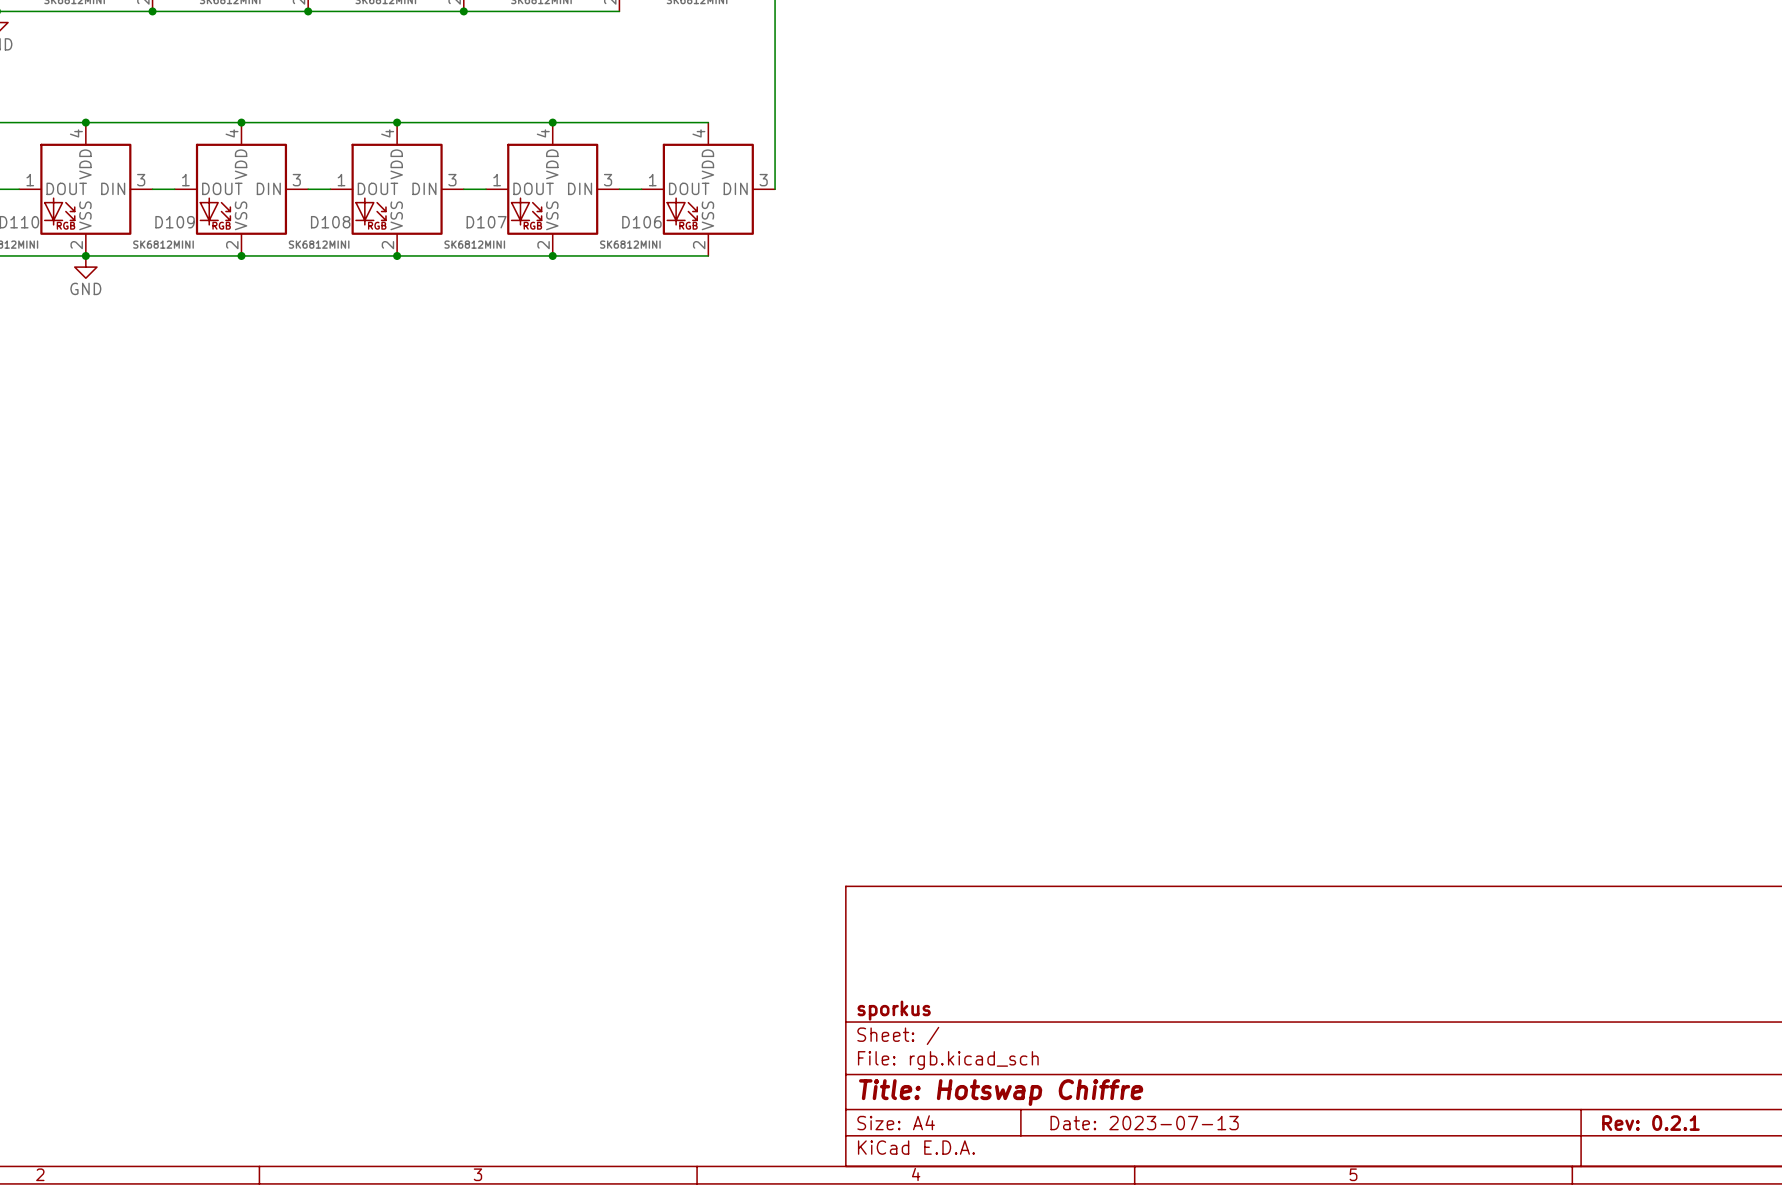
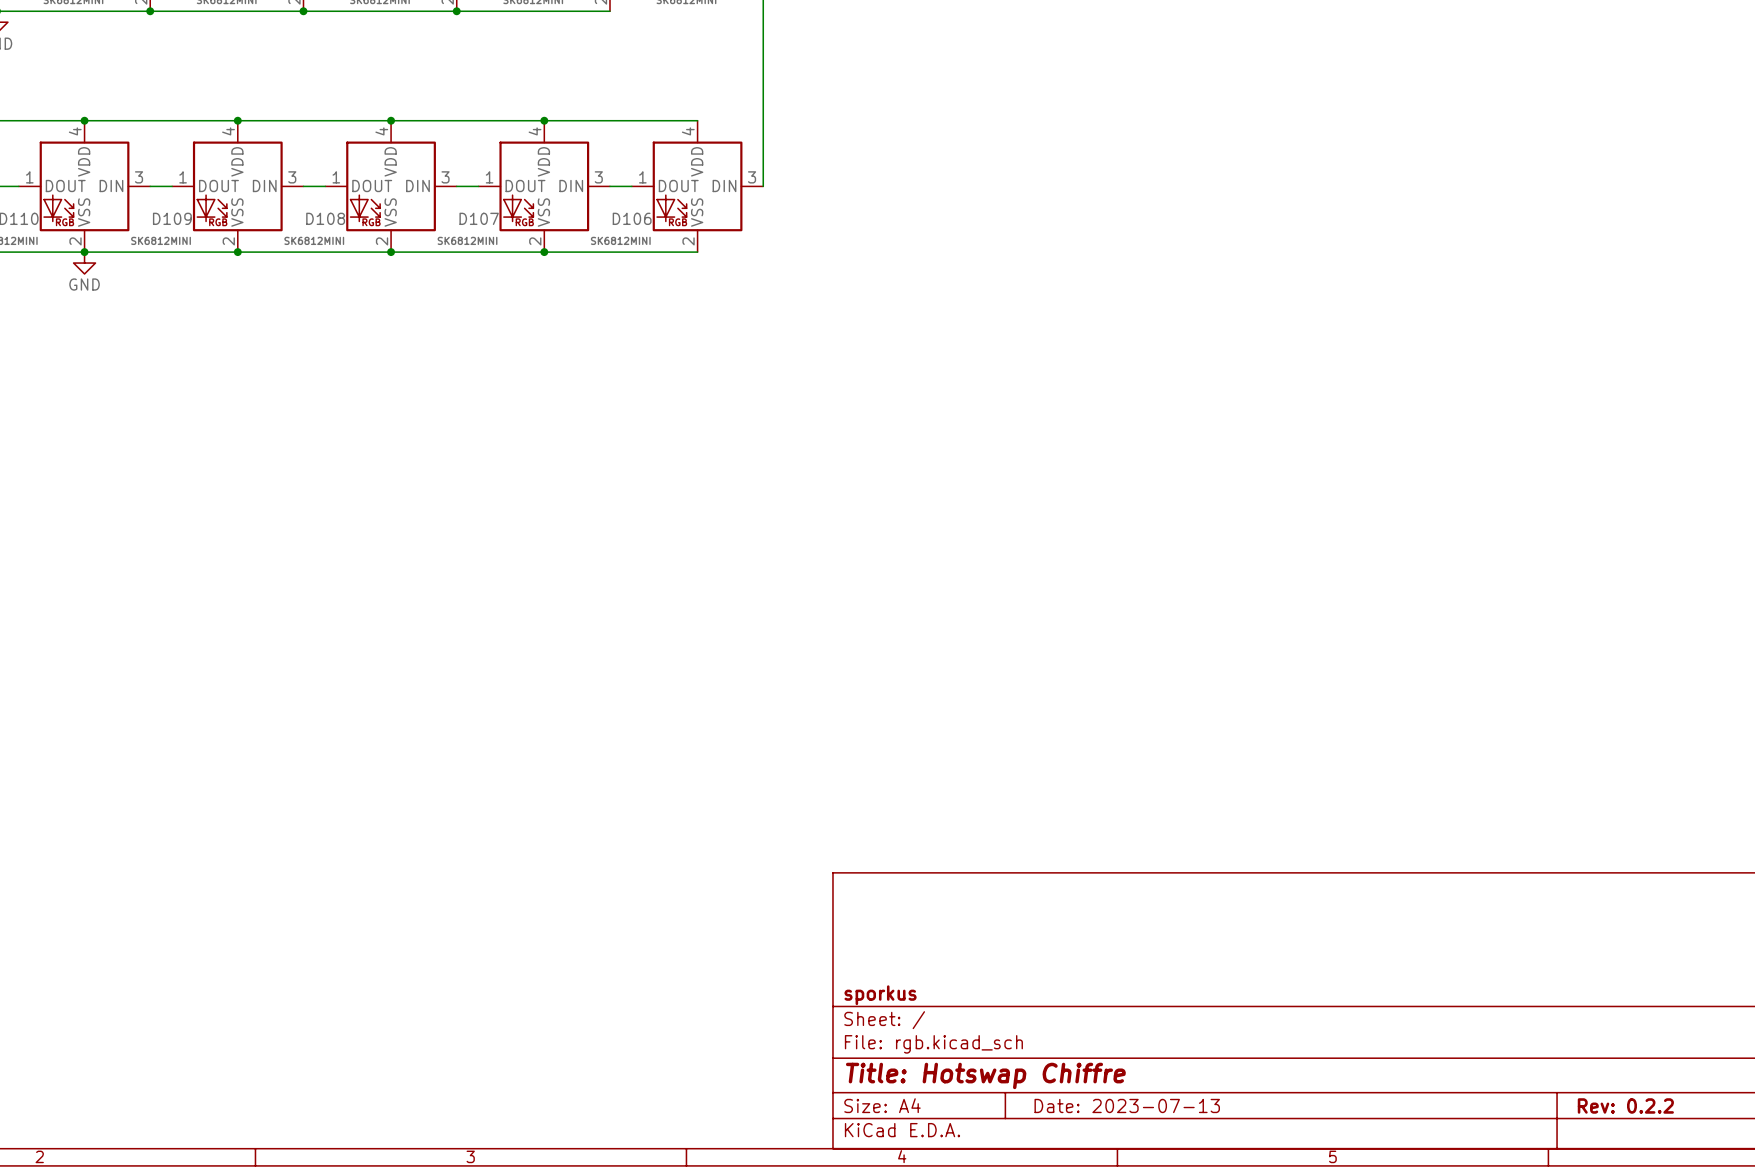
title block: Rev: 0.2.1 (1650, 1123) -> Rev: 0.2.2 (1625, 1105)

